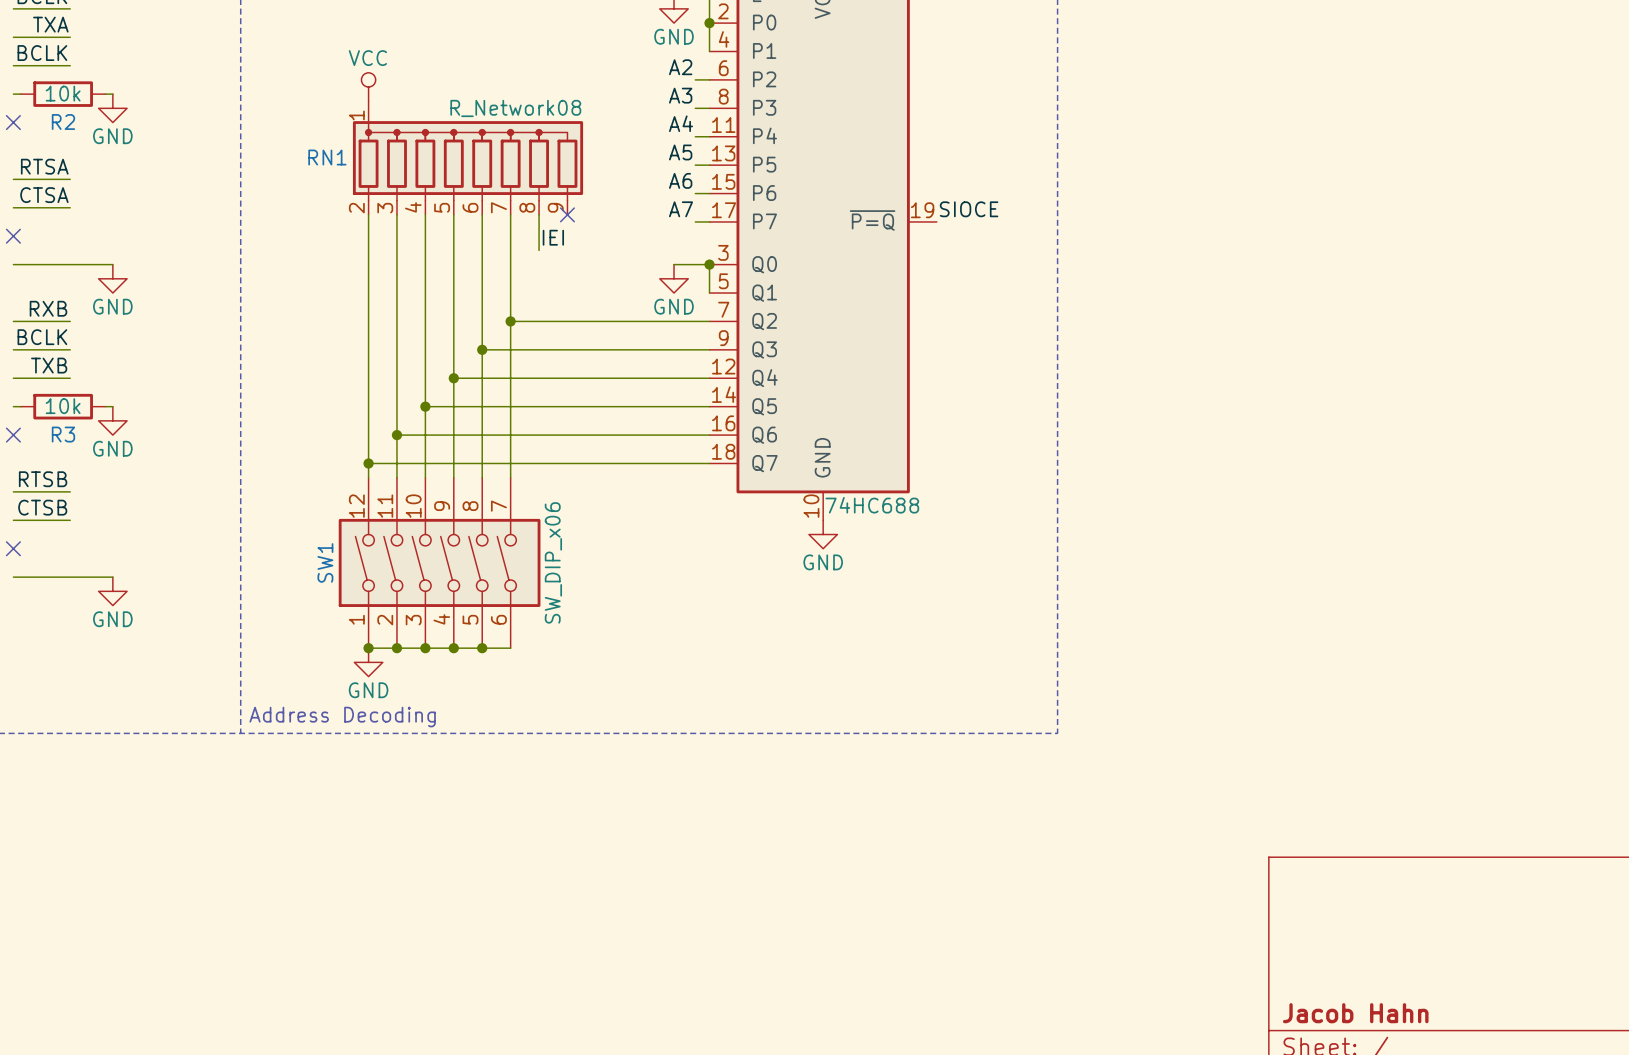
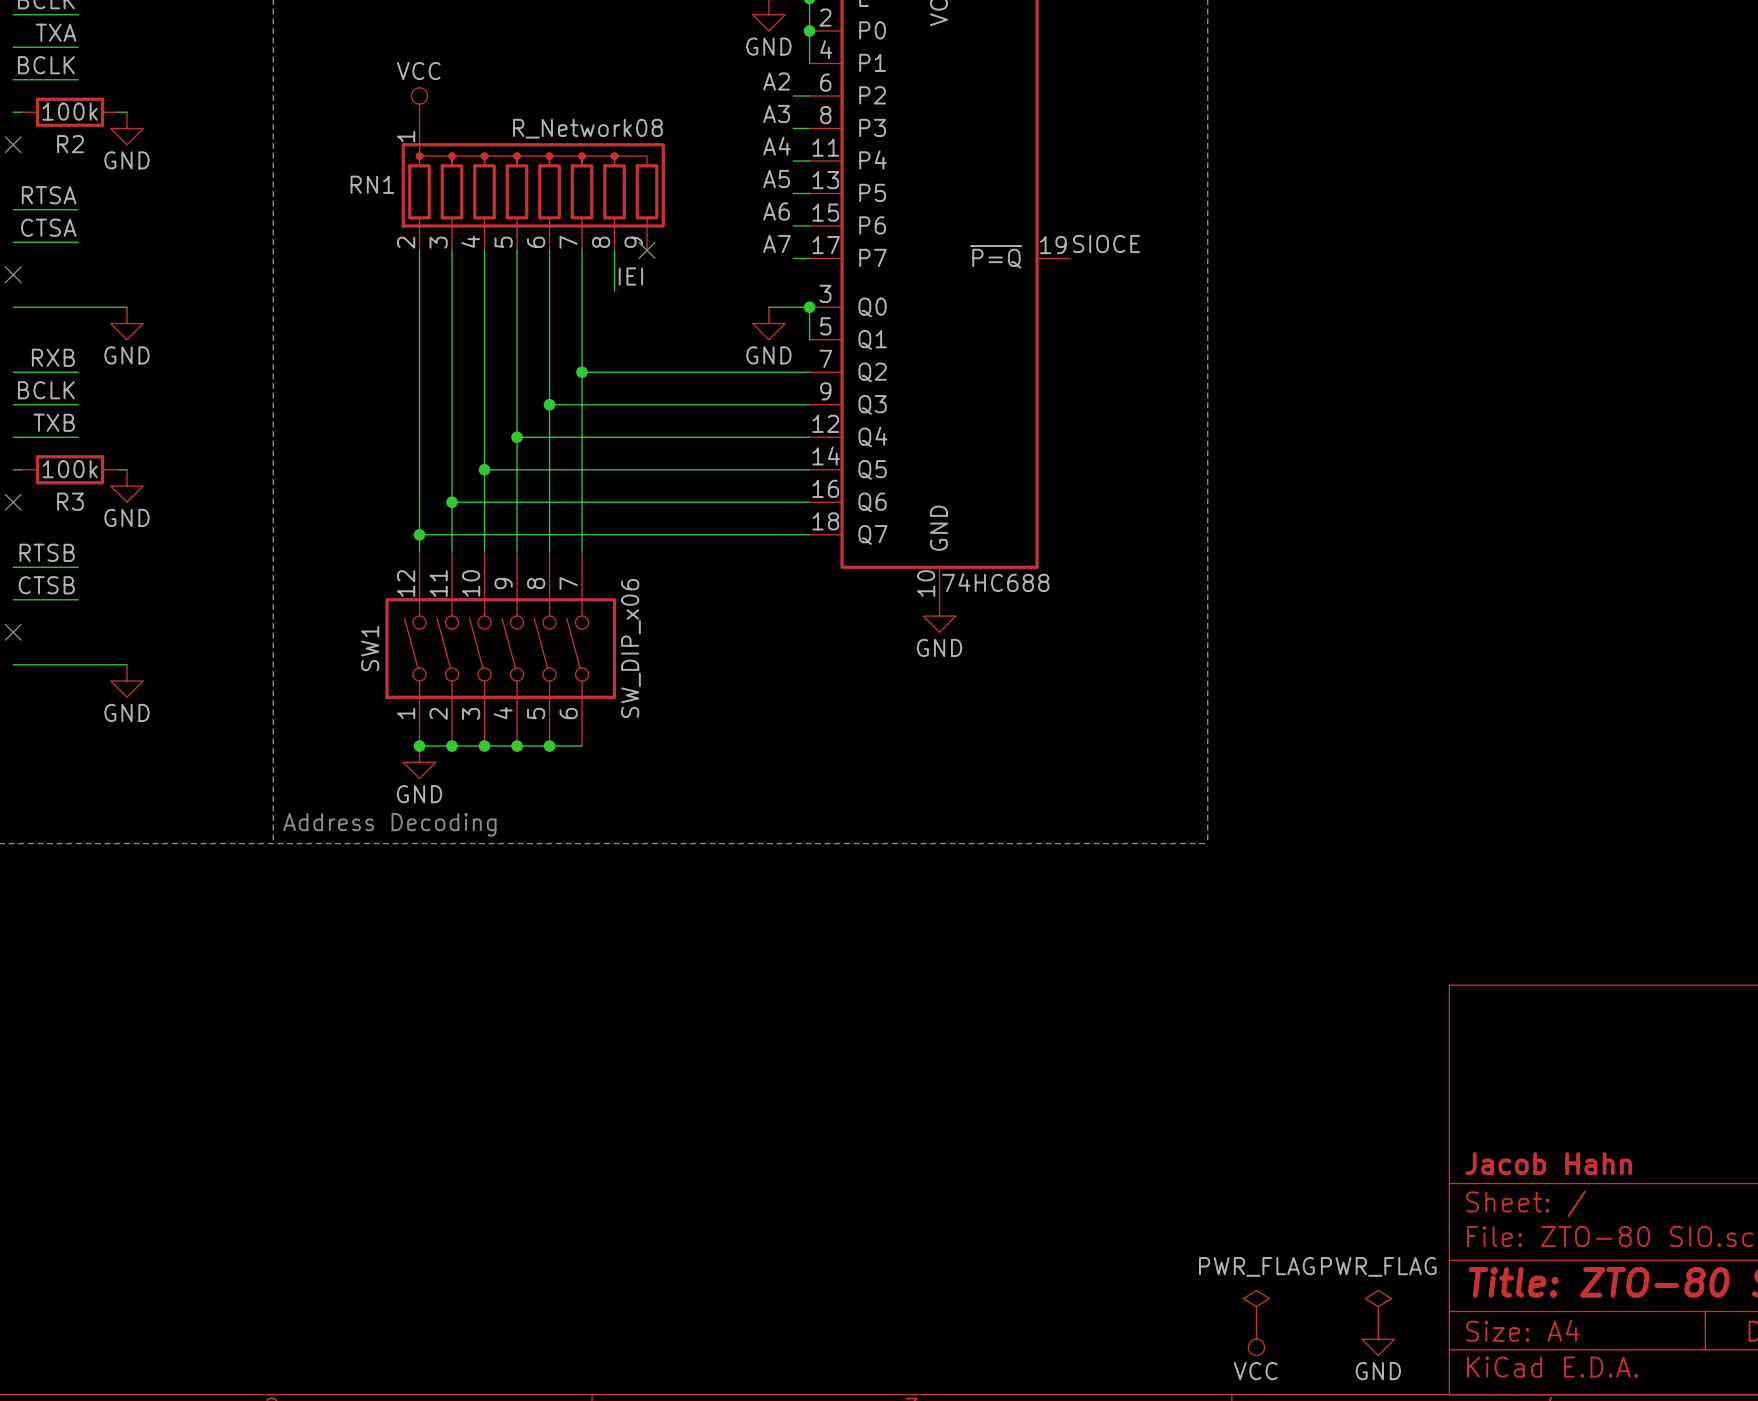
R2 value: 10k (63, 93) -> 100k (70, 111)
R3 value: 10k (63, 406) -> 100k (70, 469)

